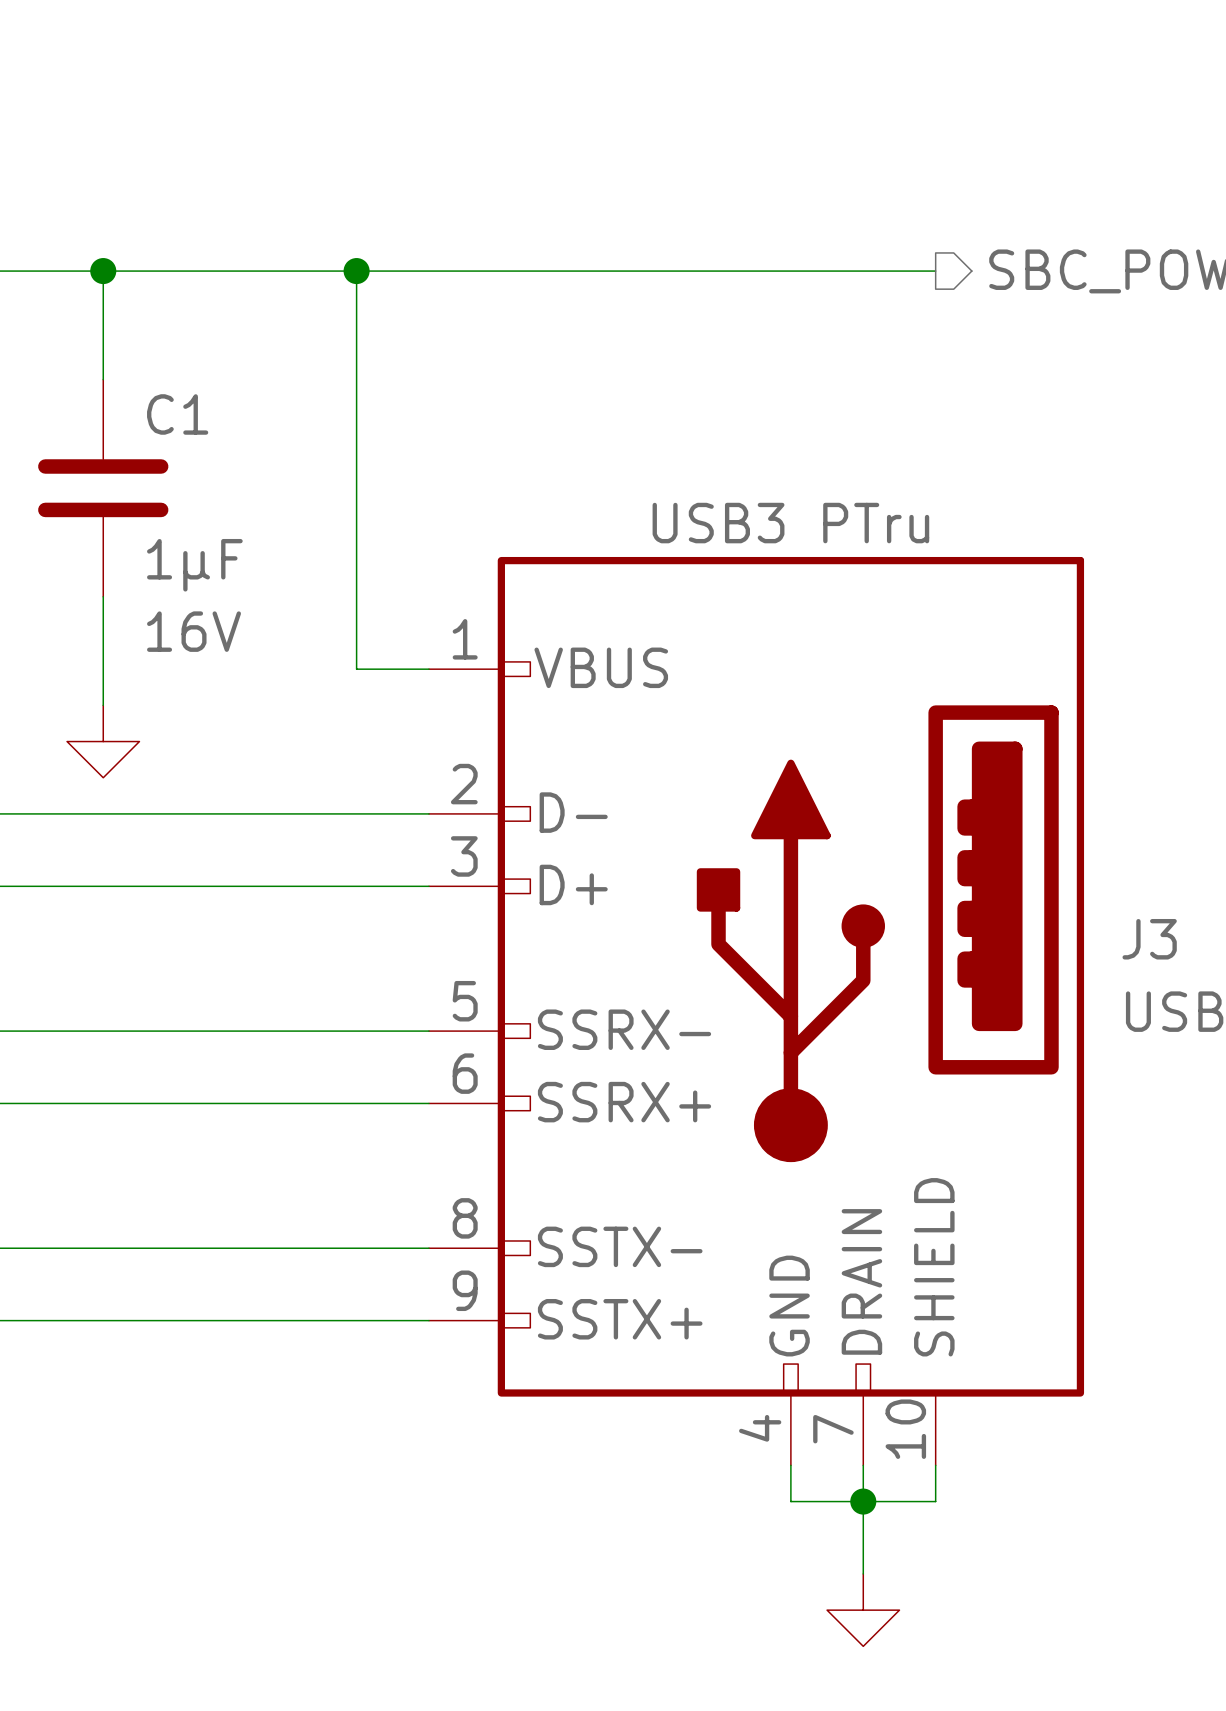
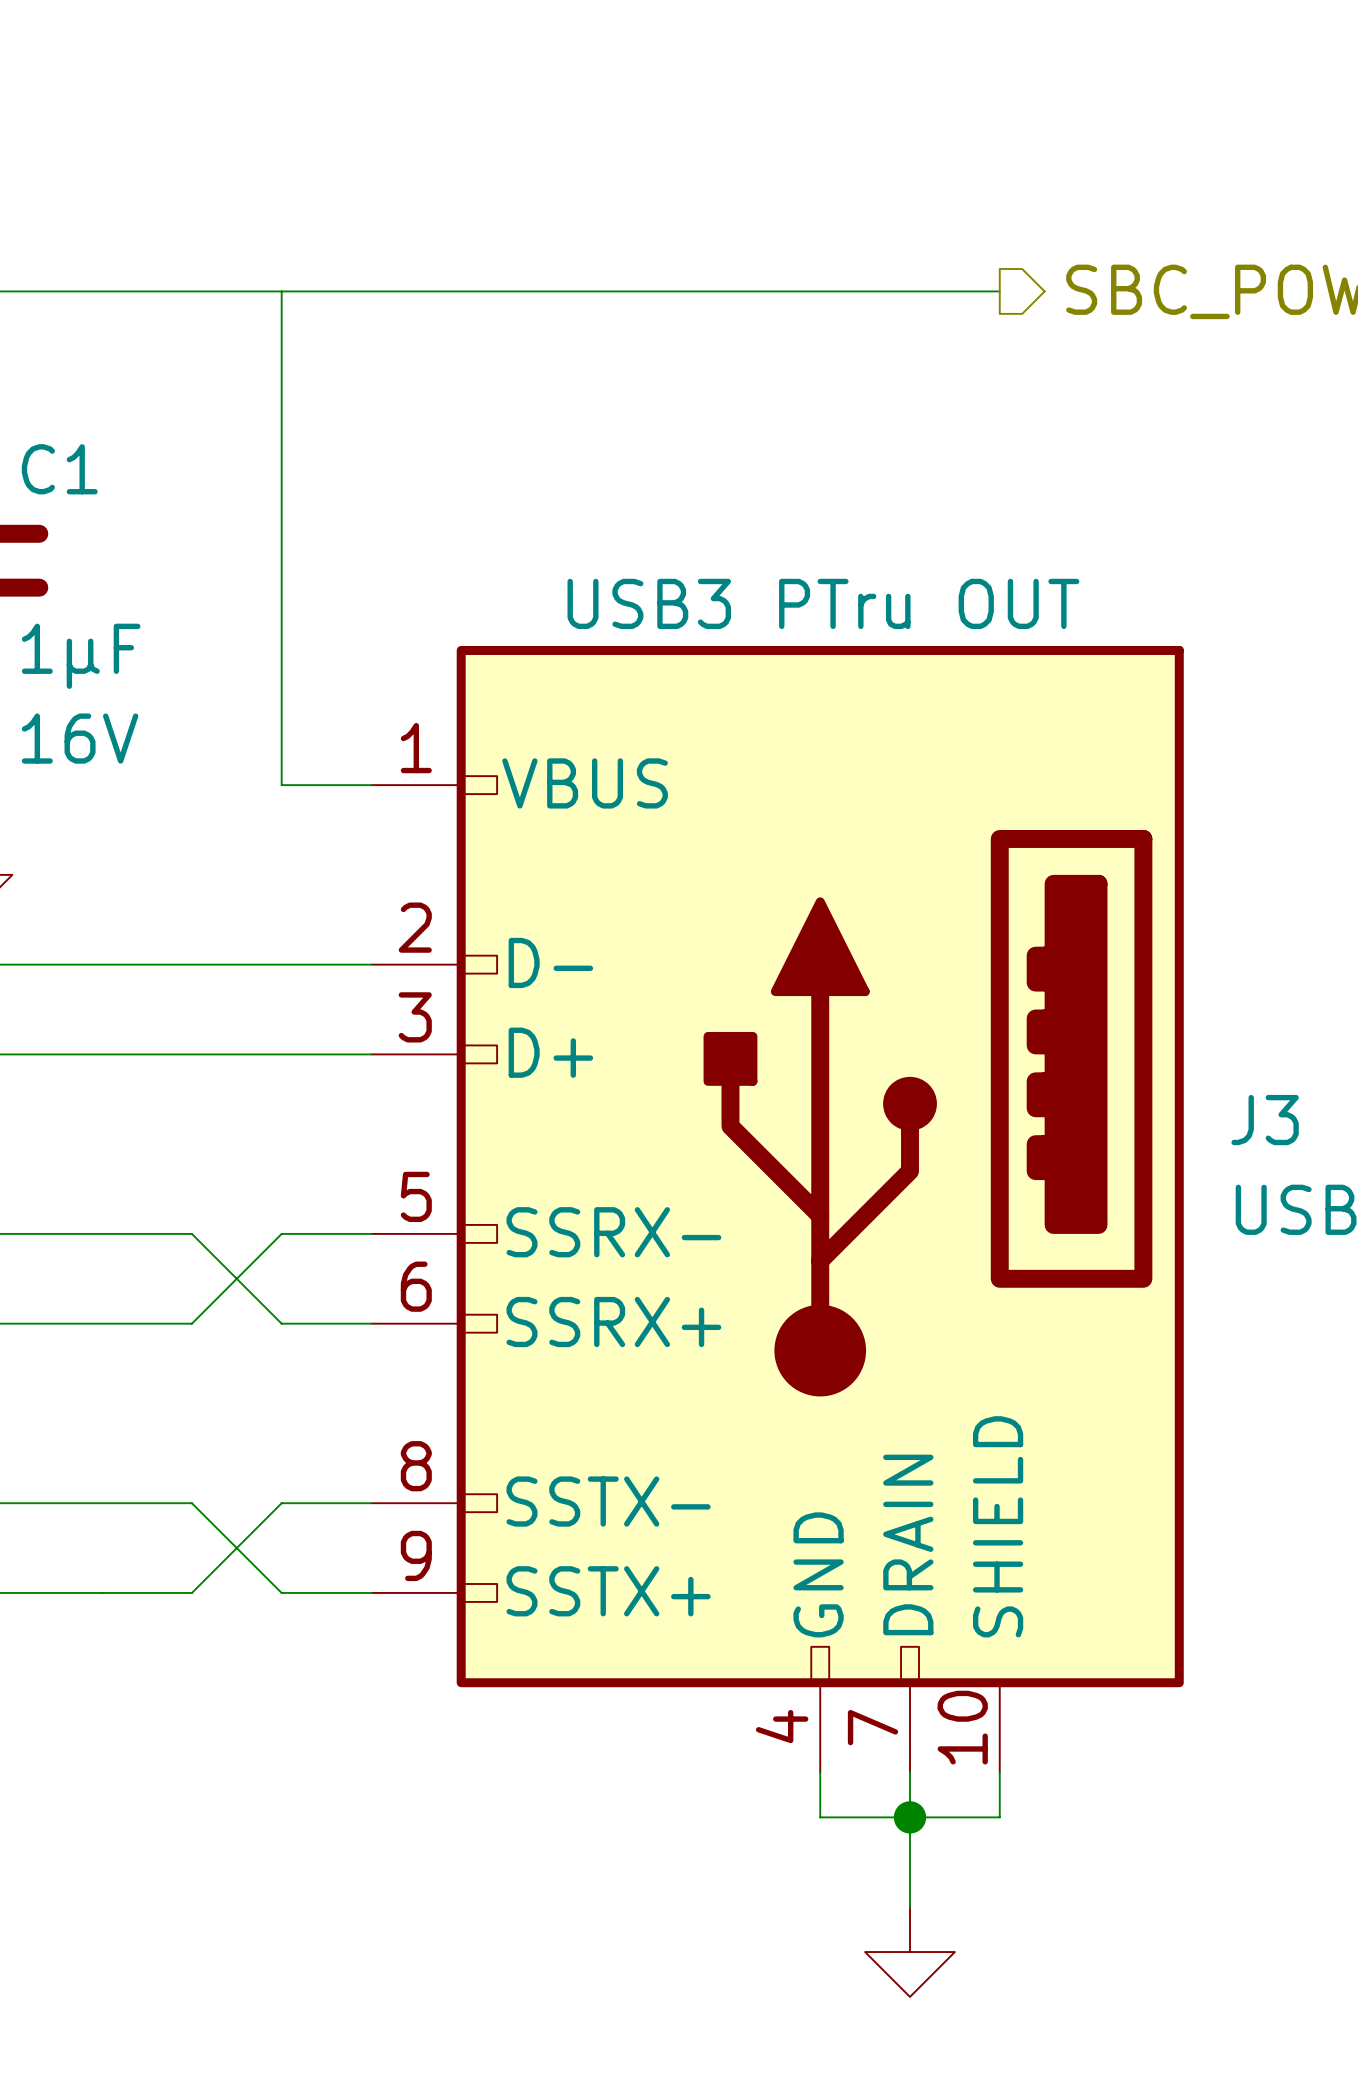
junction: (356, 271) -> none
J3 text: USB3 PTru (790, 523) -> USB3 PTru OUT (823, 603)
wire: (284, 1031) (356, 1031) -> (191, 1233) (281, 1323)
wire: (284, 1103) (356, 1103) -> (191, 1323) (281, 1233)
wire: (284, 1248) (356, 1248) -> (191, 1503) (281, 1592)
wire: (284, 1320) (356, 1320) -> (191, 1592) (281, 1503)

